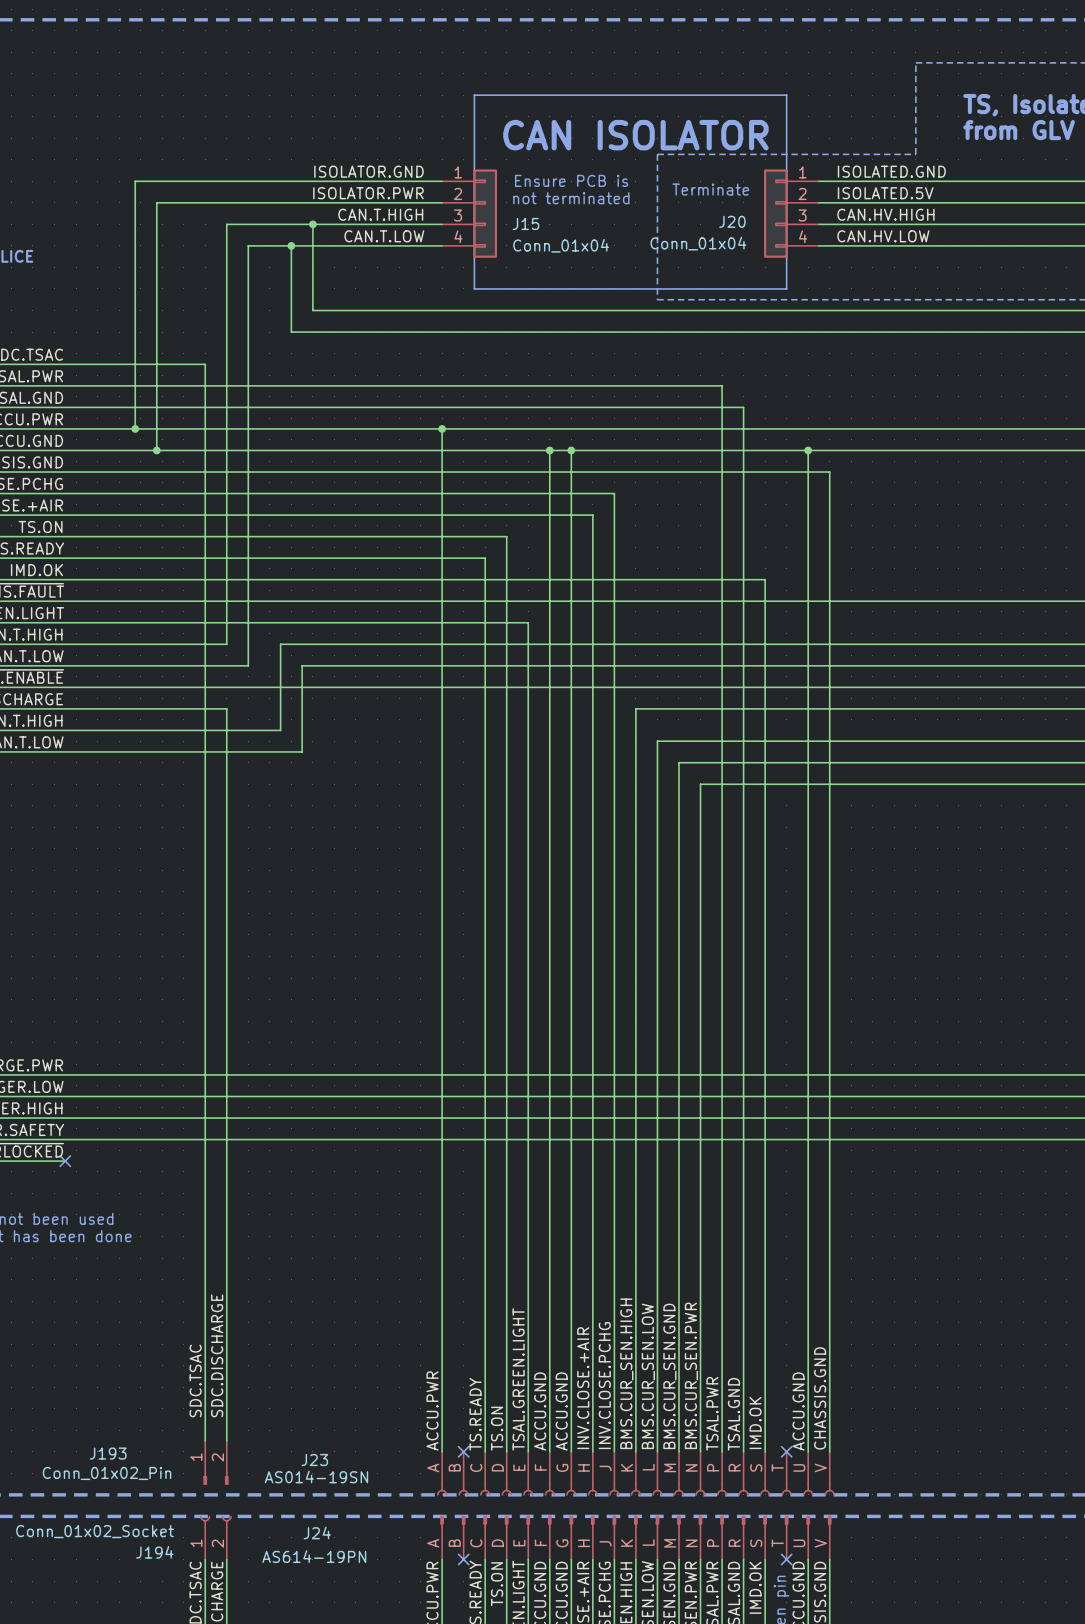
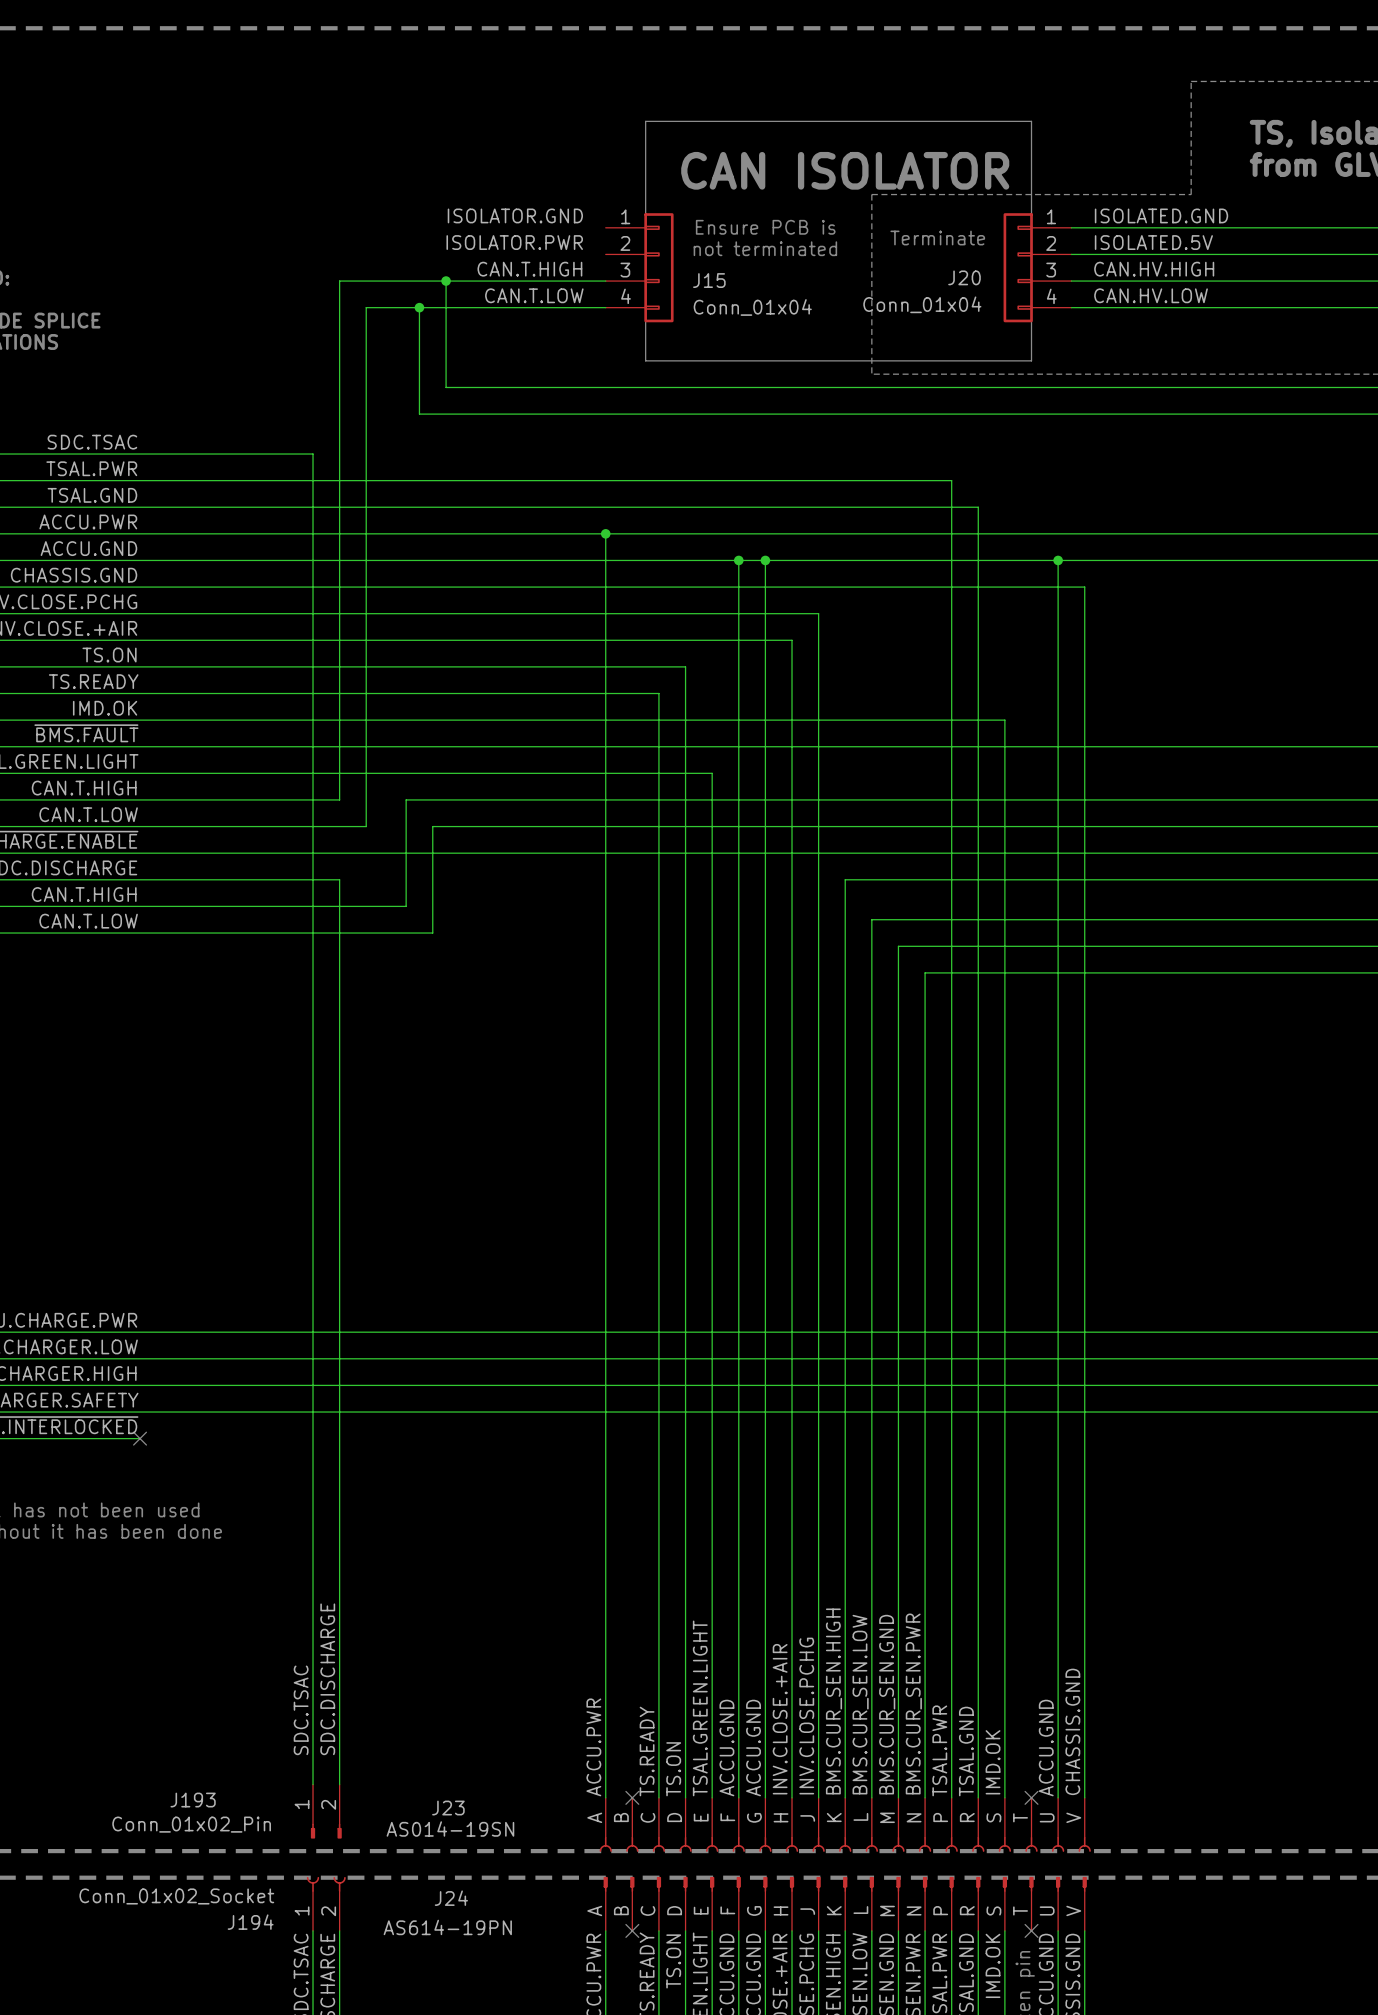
wire: (442, 181) (135, 181) (135, 428) -> none
wire: (442, 202) (156, 202) (156, 450) -> none
junction: (135, 428) -> none
junction: (156, 450) -> none

